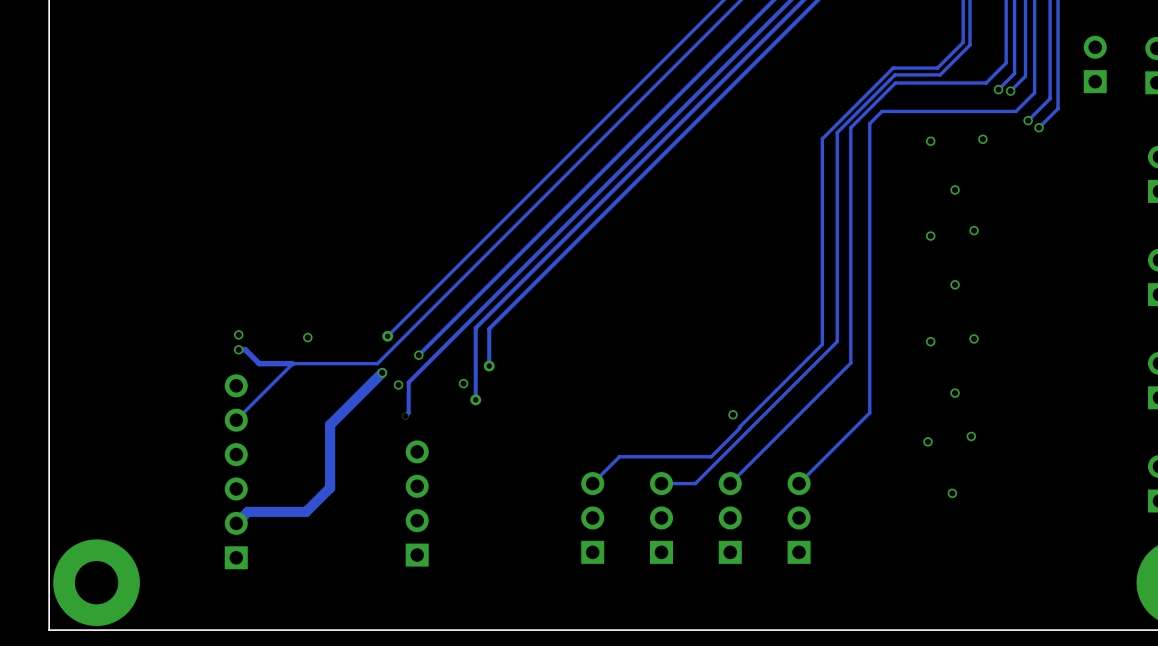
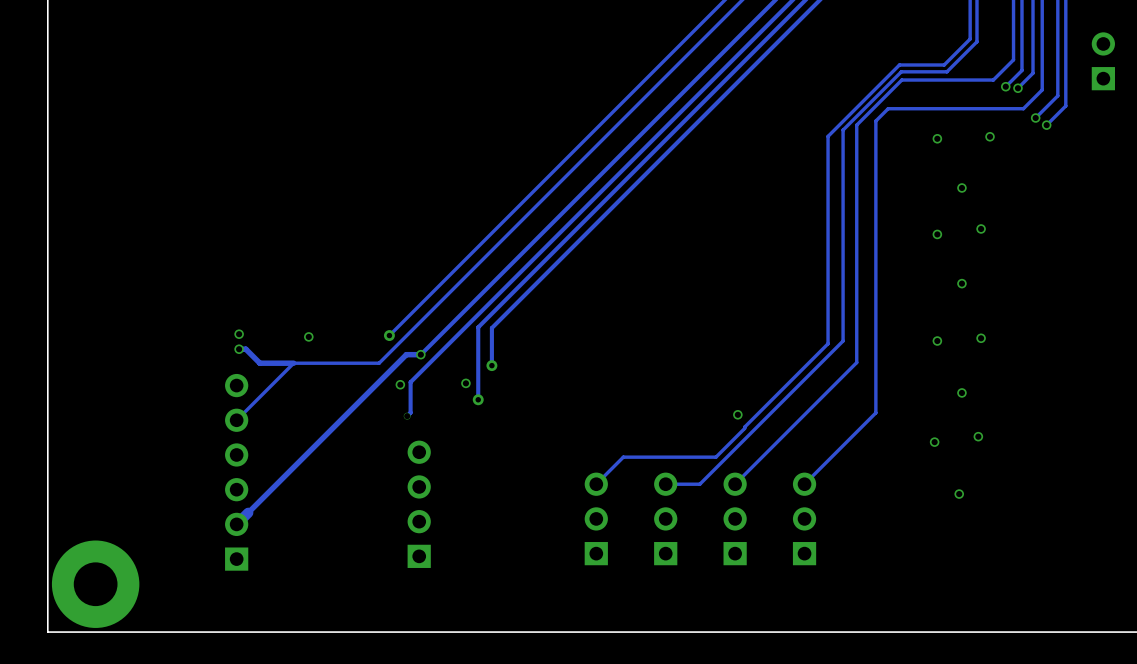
track: (382, 372) (330, 424) (330, 487) -> none
via: (382, 372) -> none
track: (330, 487) (306, 511) (247, 511) -> (420, 354) (406, 354) (248, 512)

